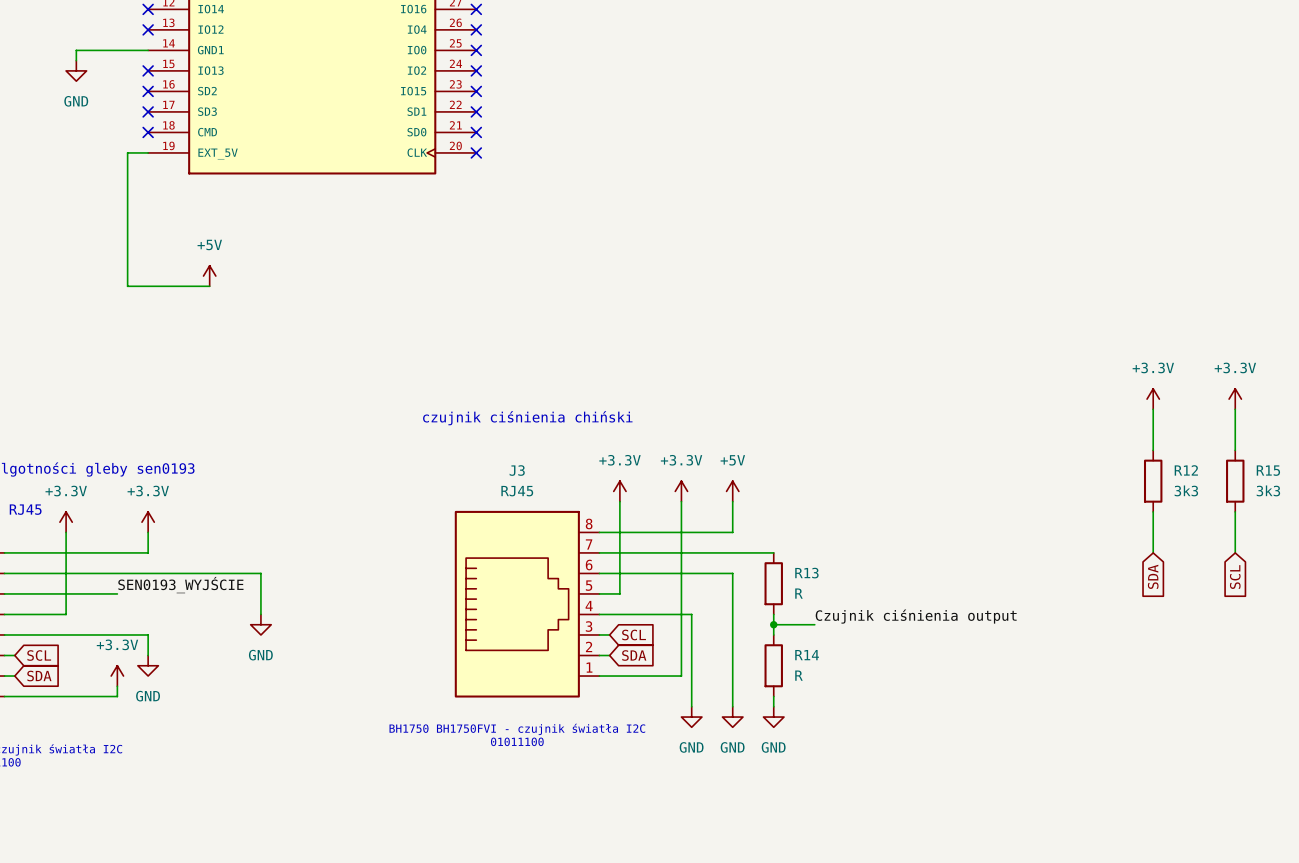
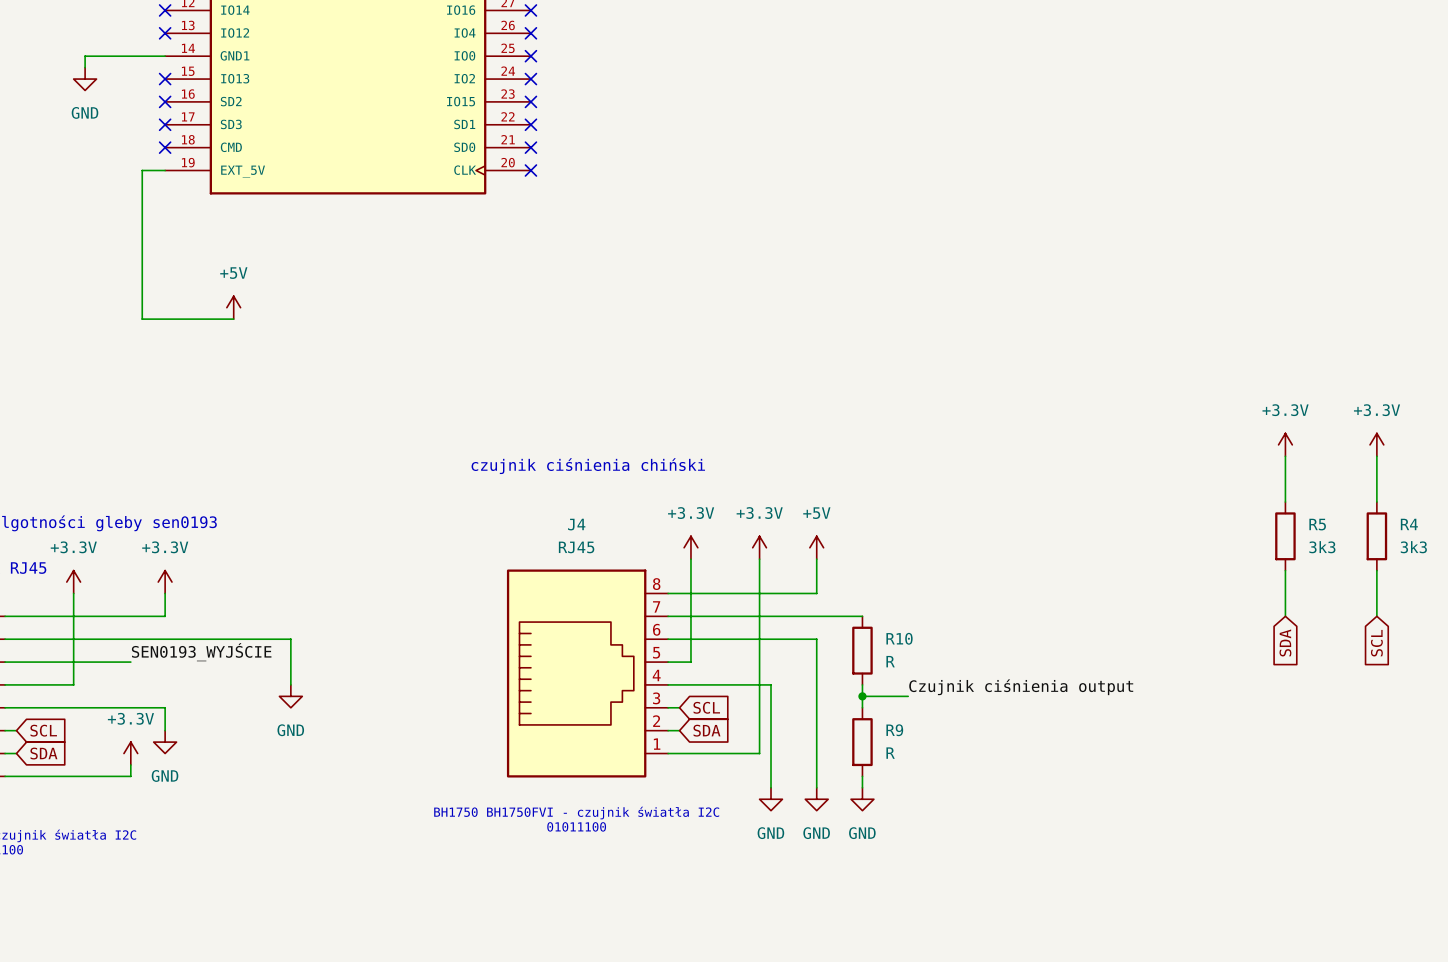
J3 name: J3 (517, 470) -> J4 (576, 524)
R12 name: R12 (1186, 470) -> R5 (1317, 524)
R15 name: R15 (1268, 470) -> R4 (1409, 524)
R13 name: R13 (806, 573) -> R10 (899, 638)
R14 name: R14 (807, 655) -> R9 (894, 730)

